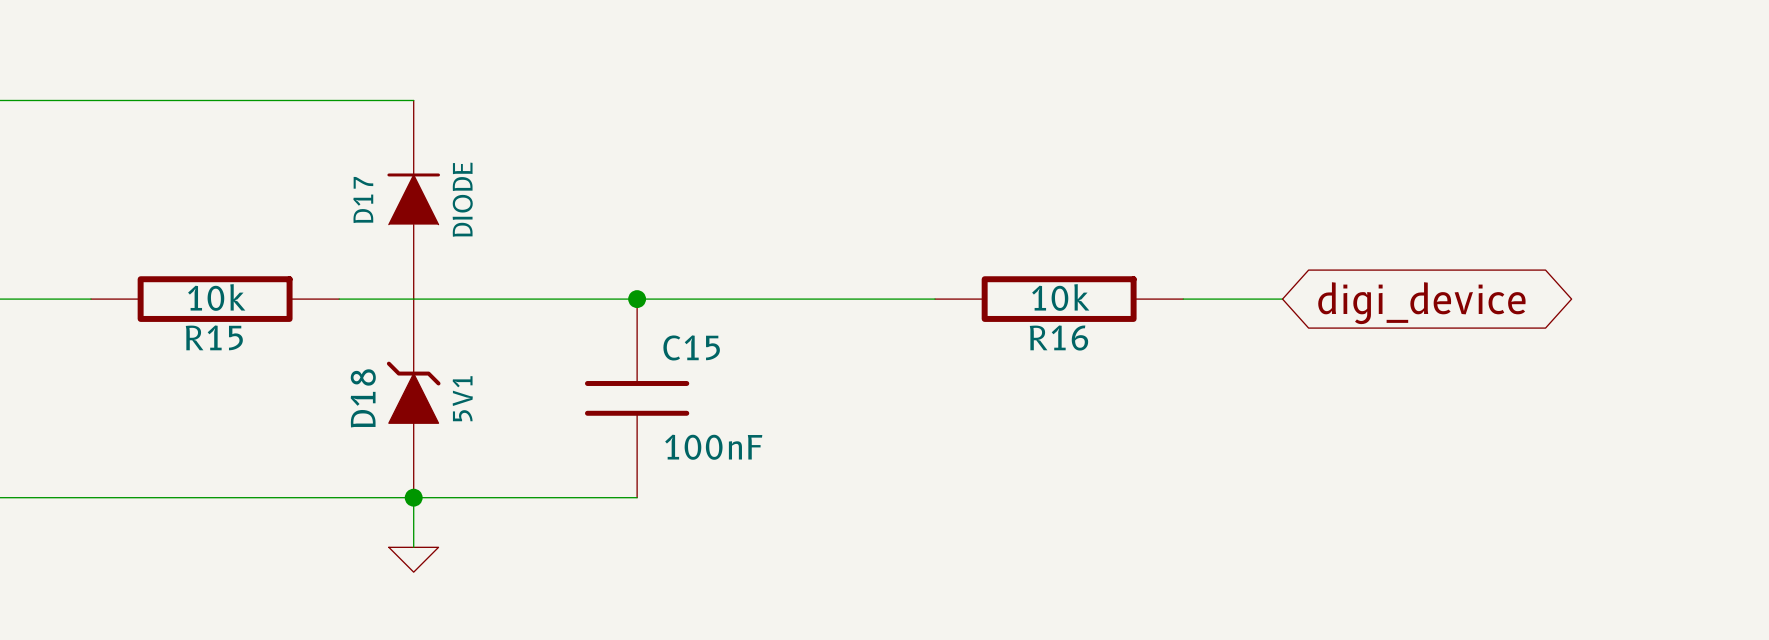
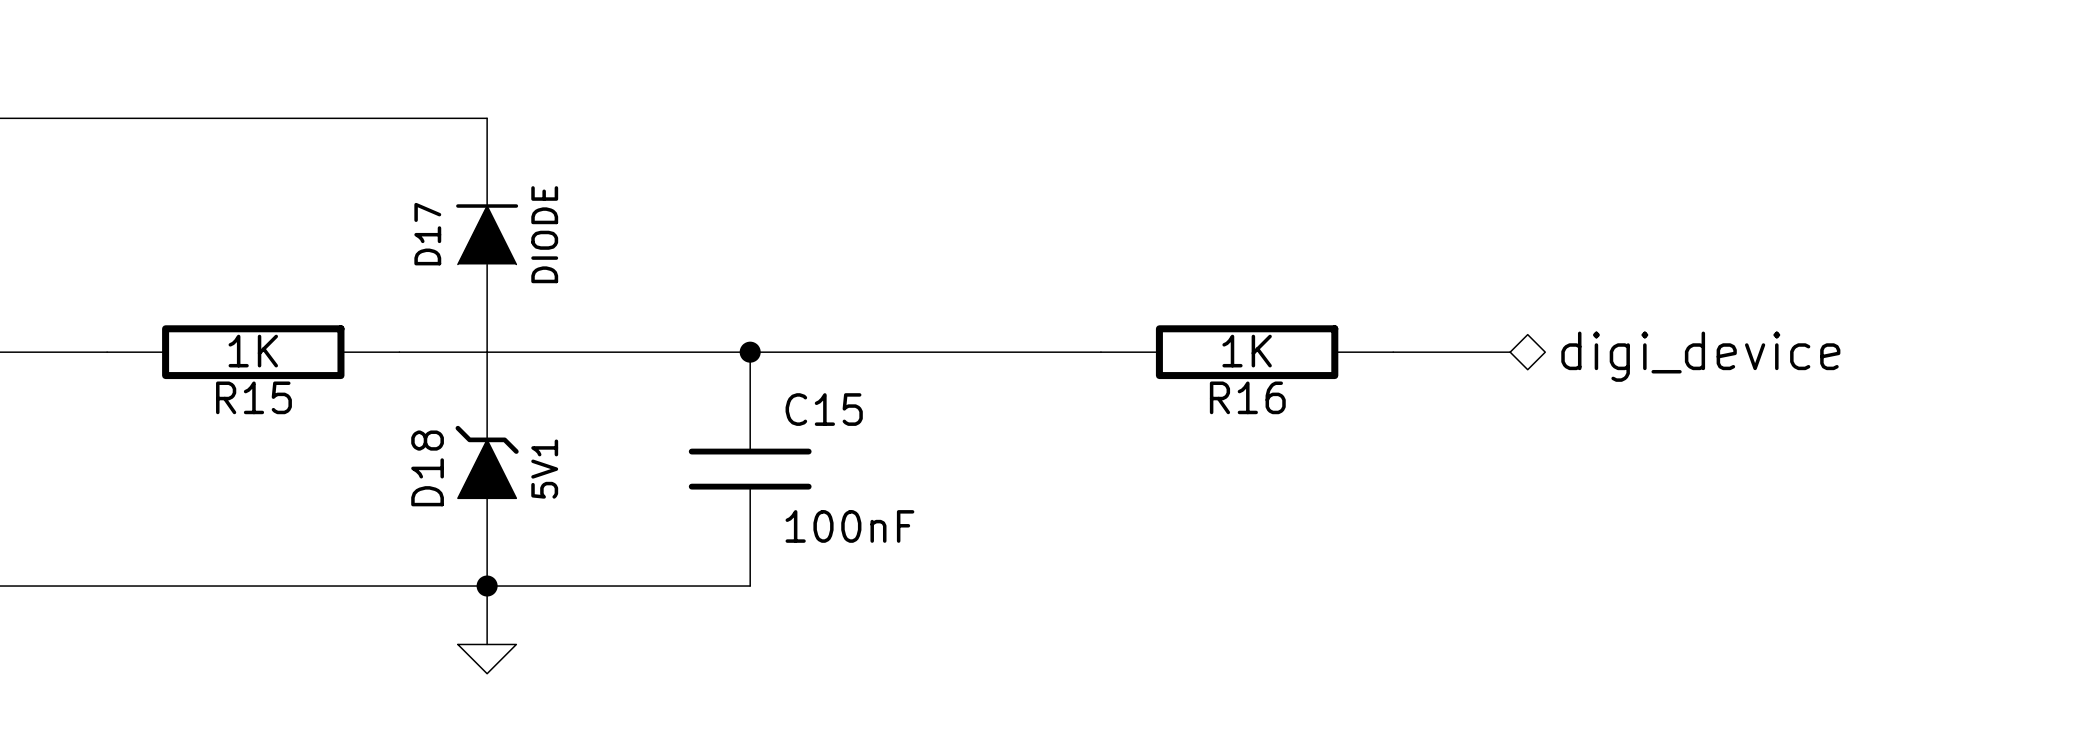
R15 value: 10k (216, 297) -> 1K (253, 351)
R16 value: 10k (1060, 297) -> 1K (1247, 351)
hierarchical label: none -> digi_device (1700, 356)
global label: digi_device (1421, 303) -> none

